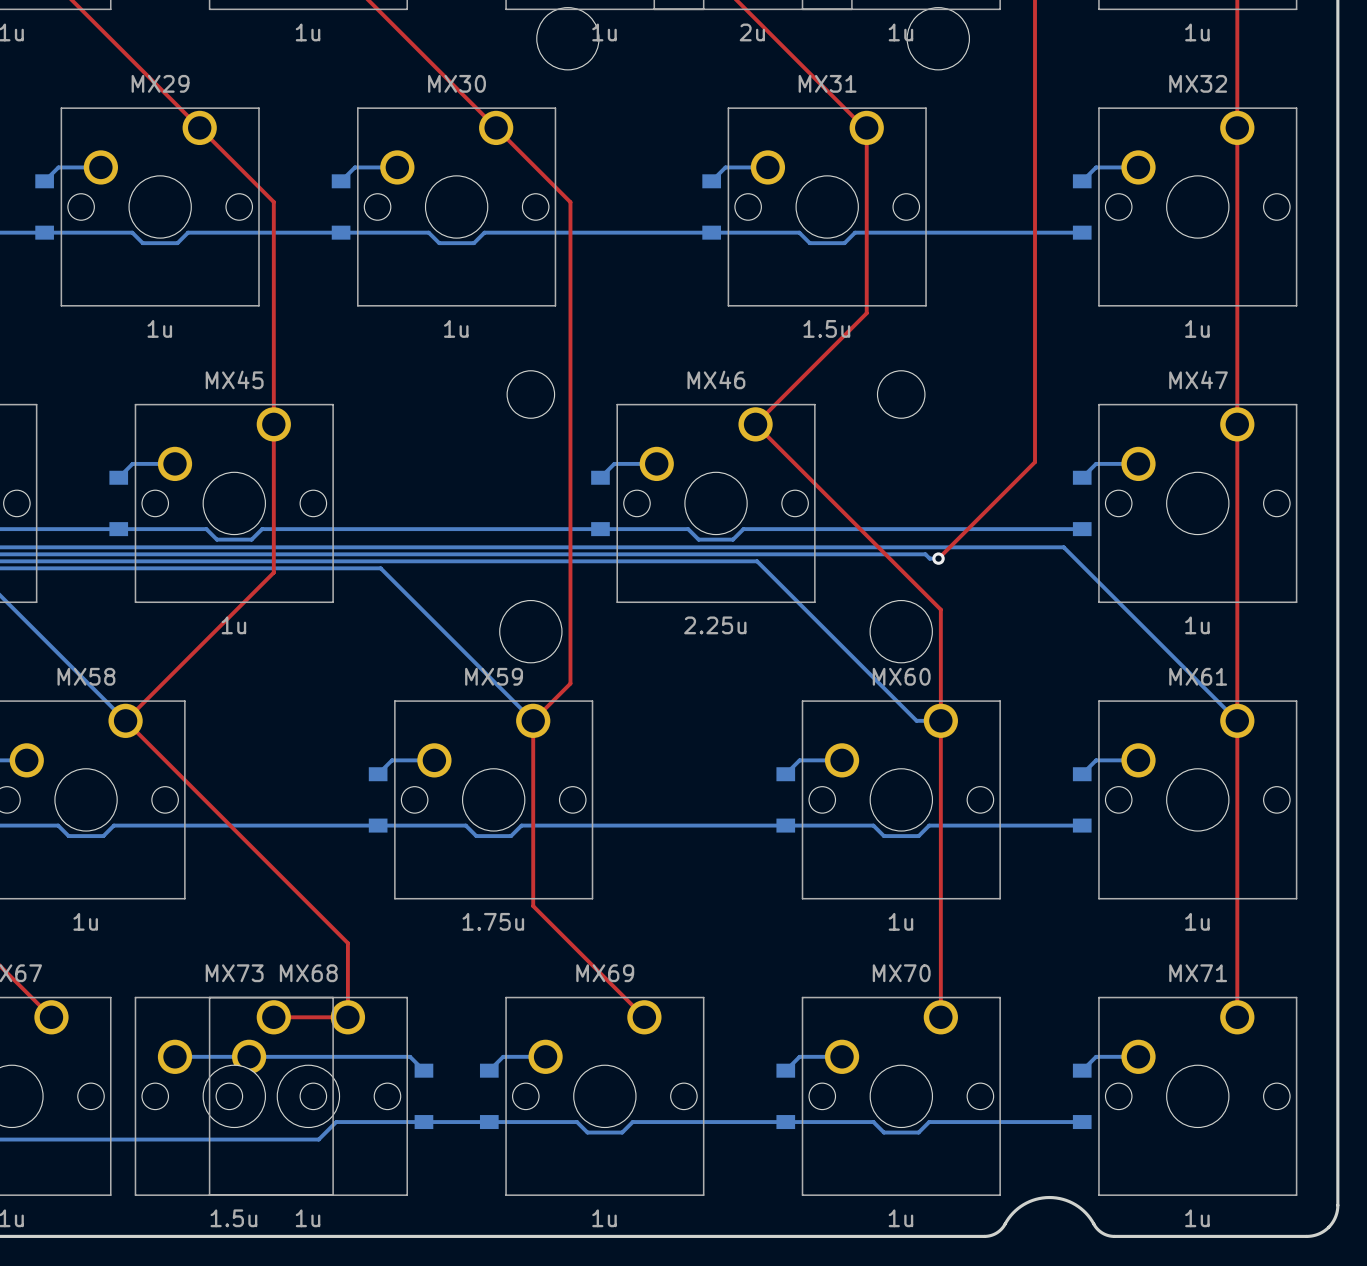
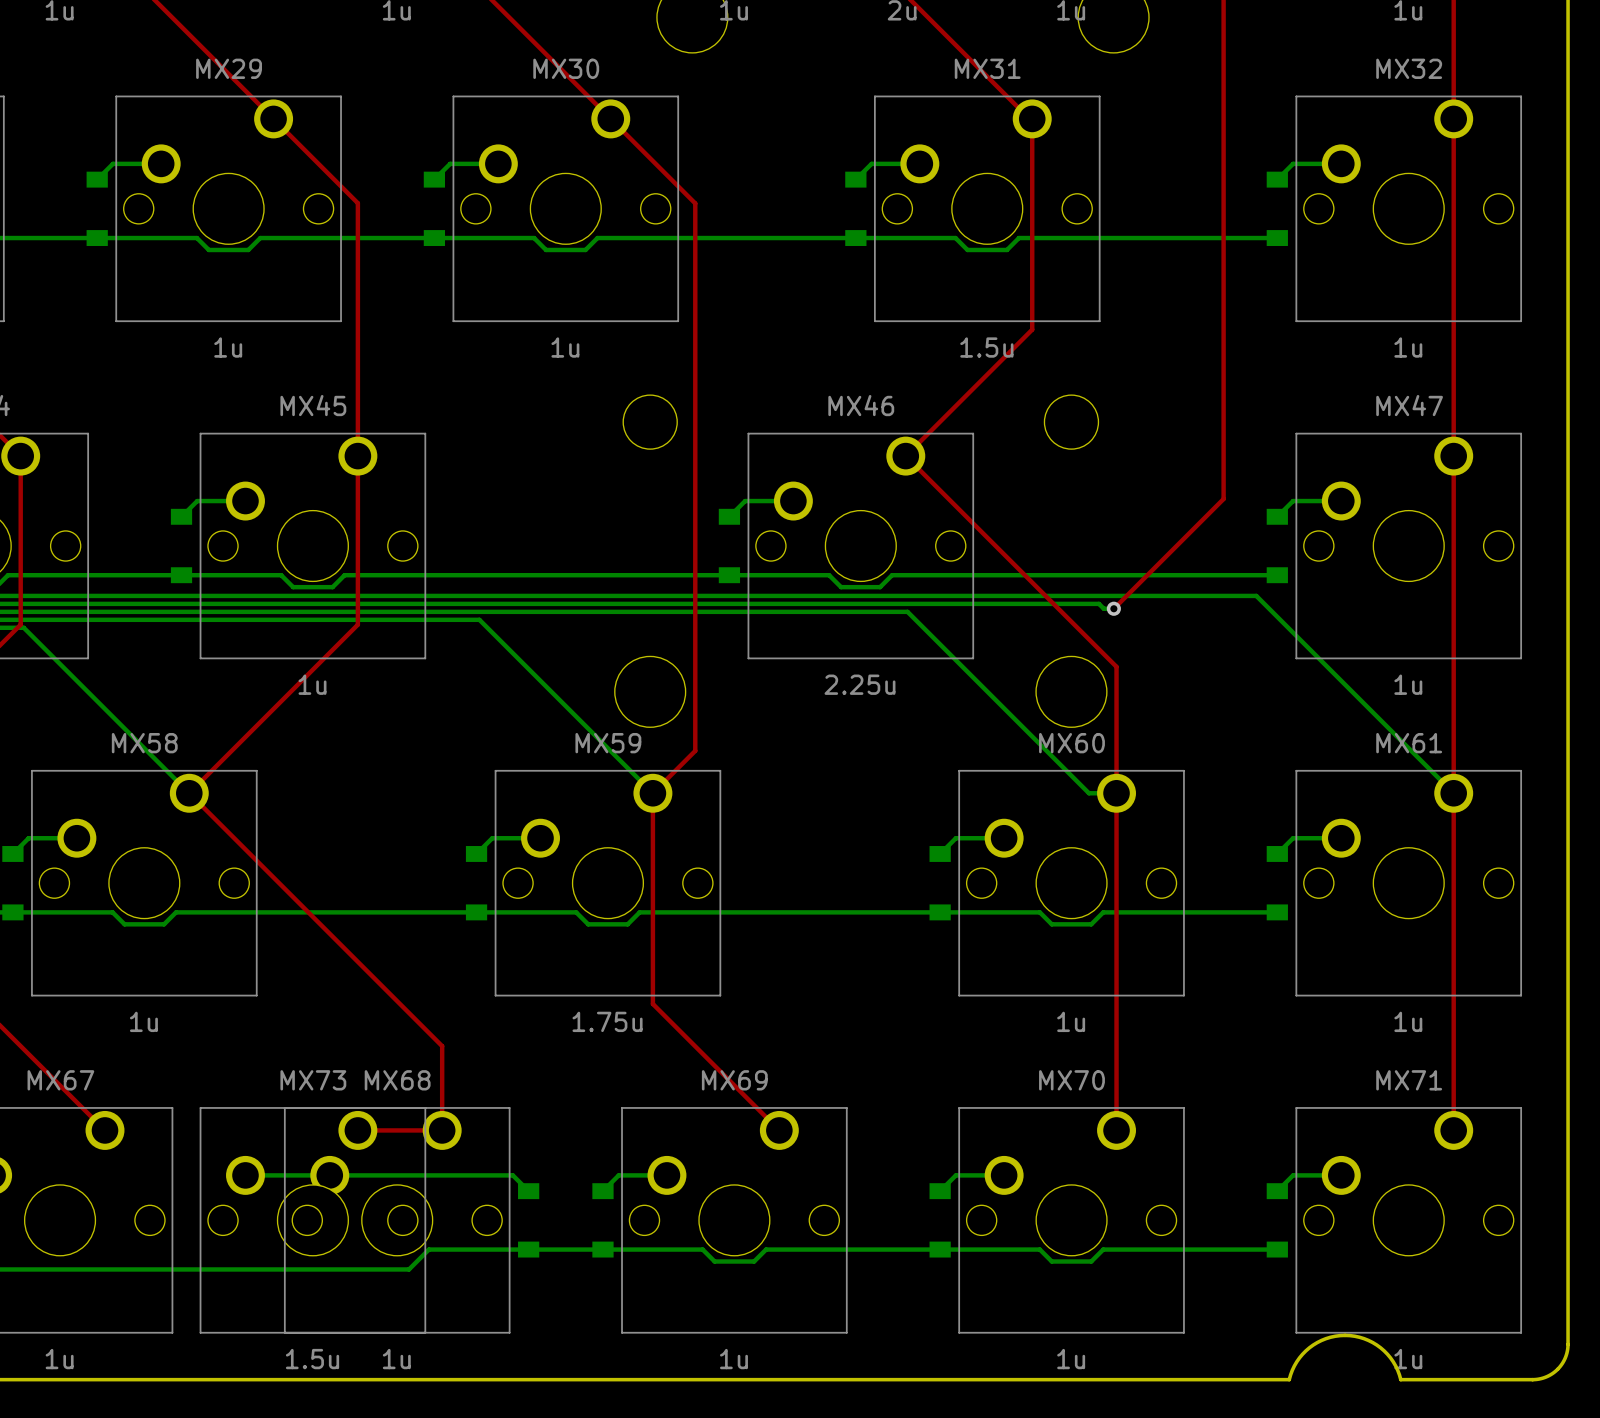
board edge: (984, 1236) (999, 1231) (1013, 1213) (1023, 1204) (1035, 1199) (1049, 1197) (1063, 1199) (1078, 1206) (1088, 1215) (1098, 1230) (1108, 1235) (1190, 1236) -> (1166, 1379) (1289, 1379) (1296, 1361) (1309, 1347) (1325, 1338) (1345, 1335) (1364, 1338) (1380, 1347) (1393, 1361) (1400, 1379)

